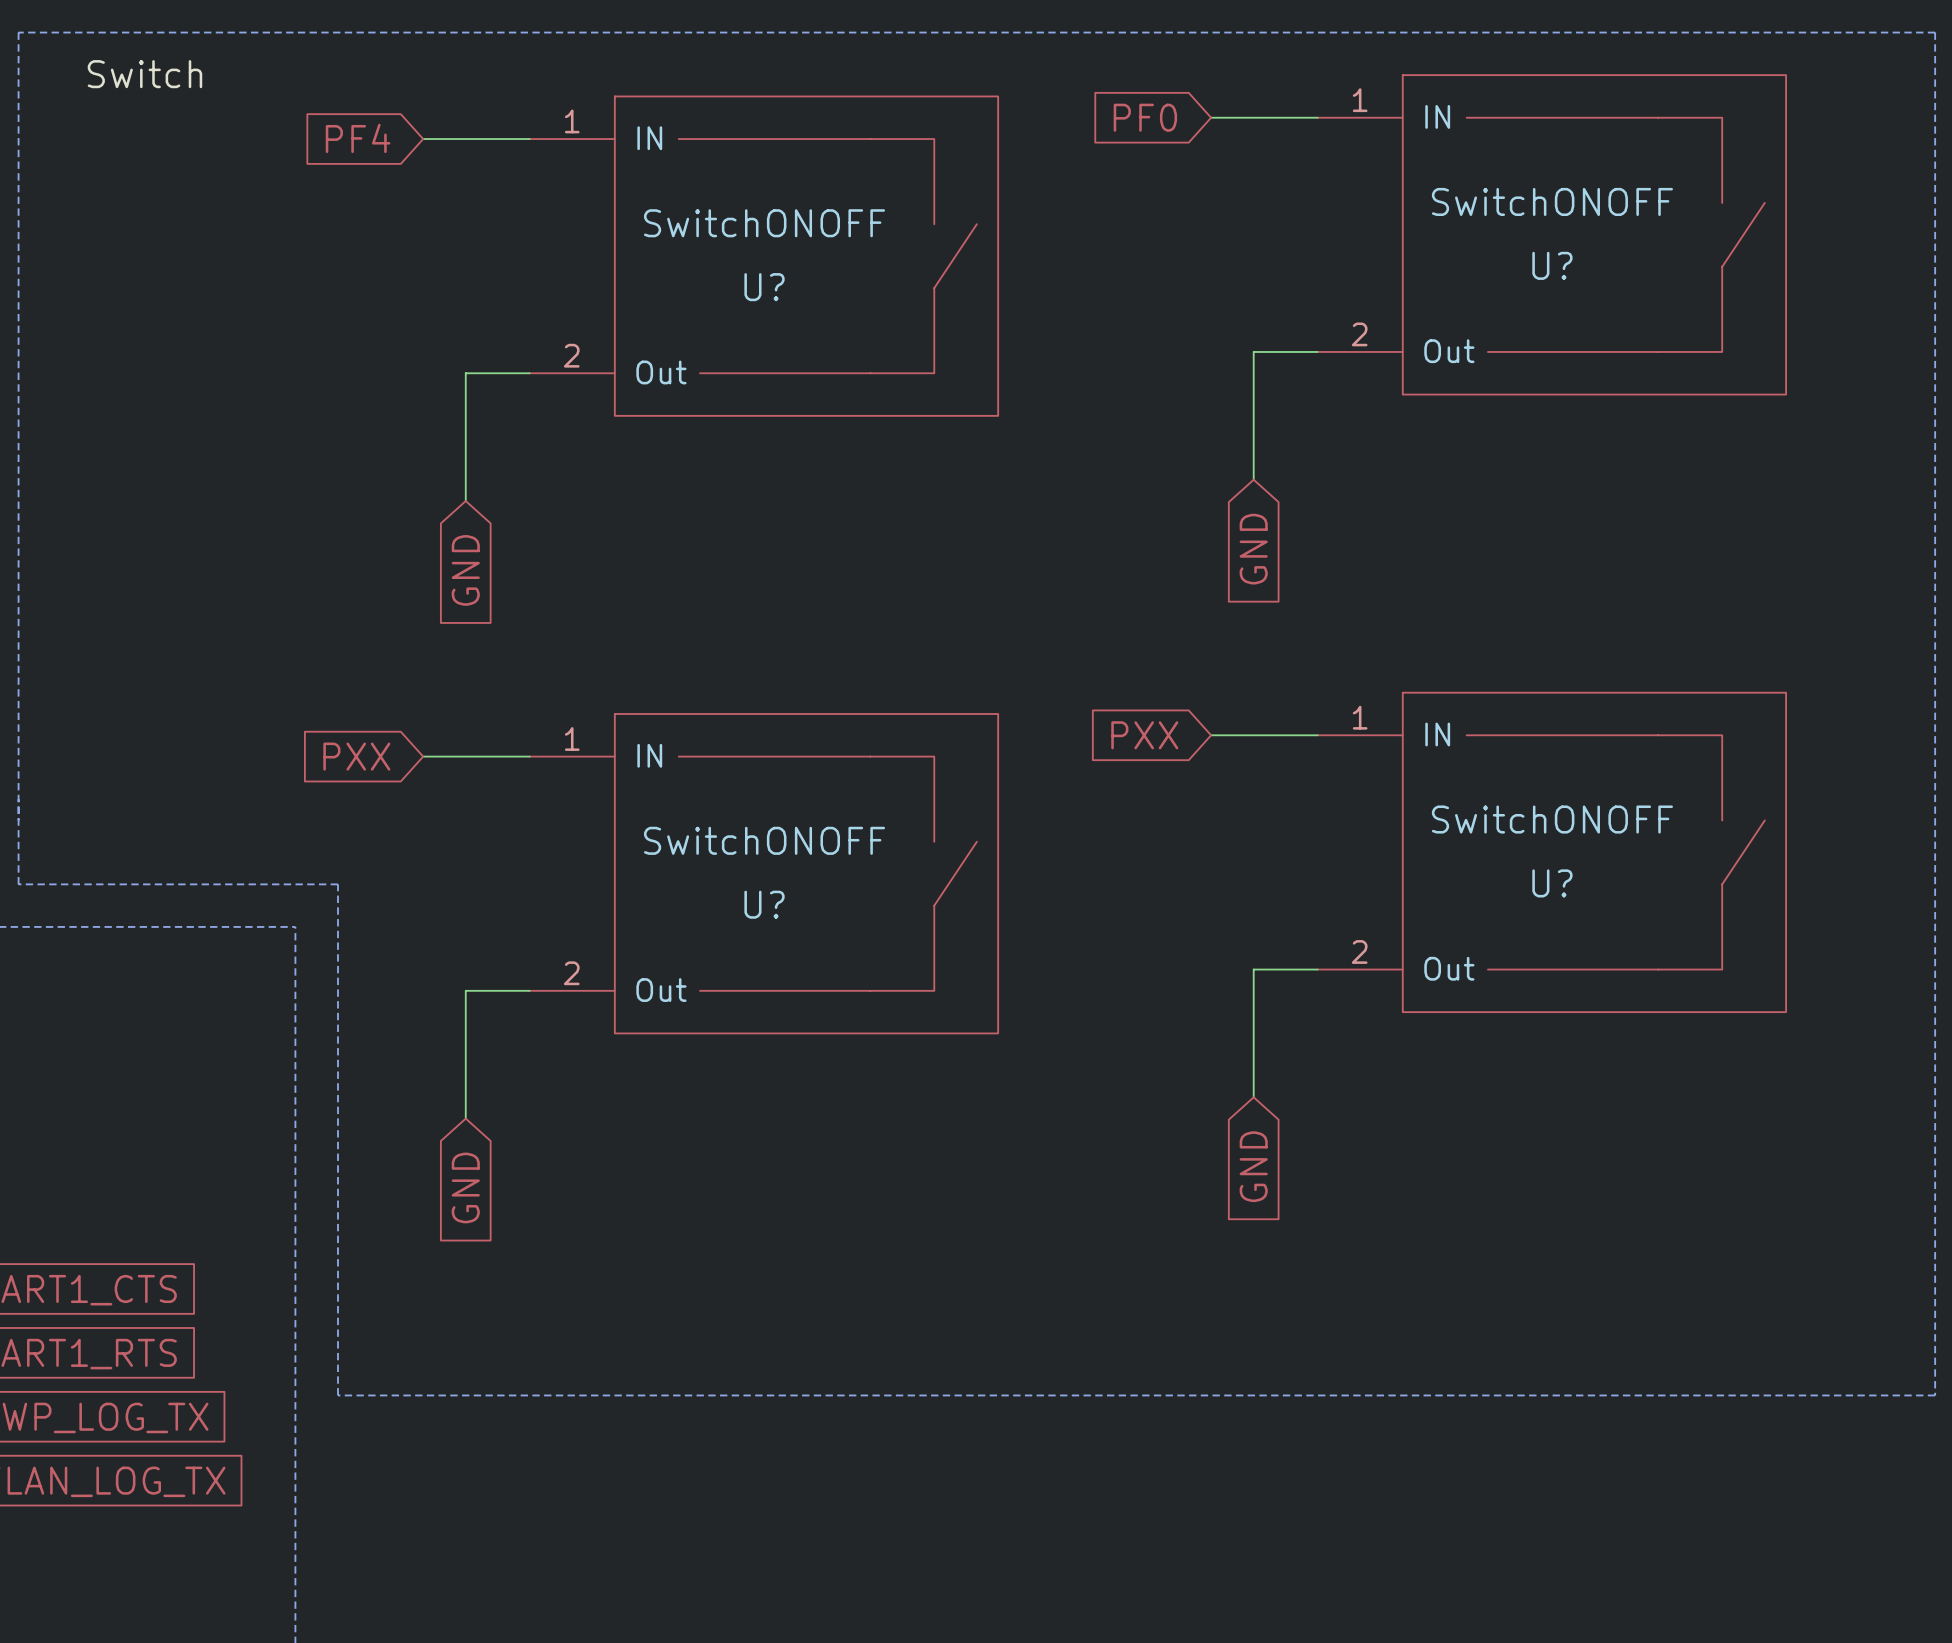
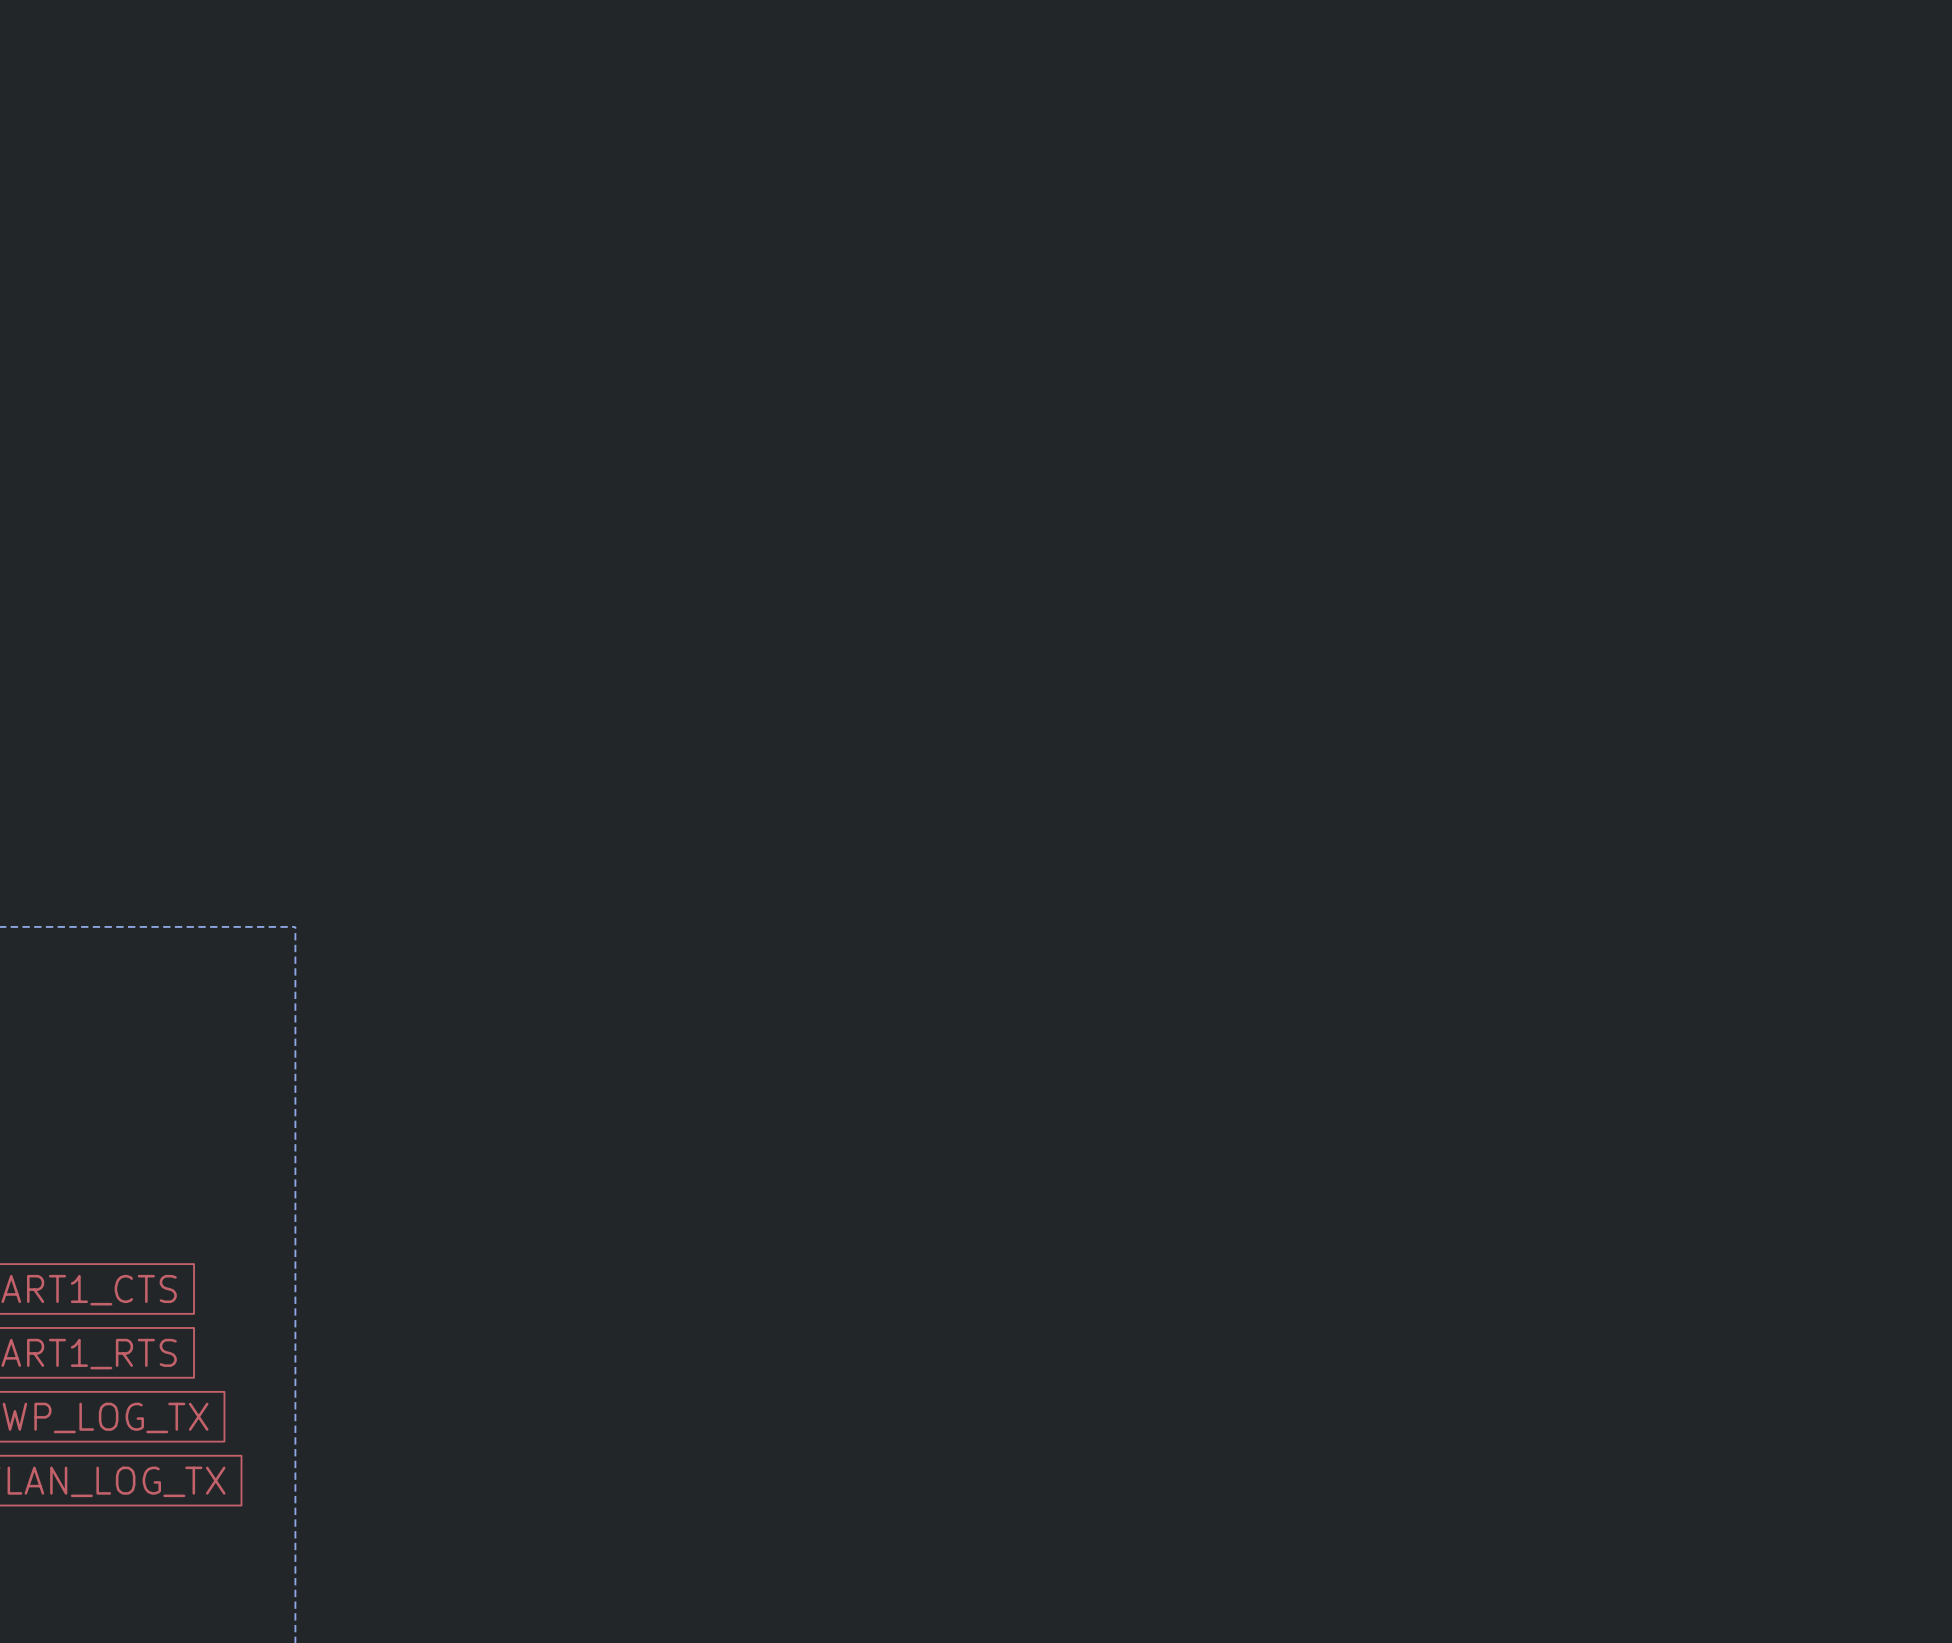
line: (18, 32) (18, 884) (337, 884) (337, 1395) (1935, 1395) (1935, 32) (18, 32) -> none
label: Switch (144, 74) -> none
global label: PF0 (1145, 117) -> none
wire: (1211, 117) (1317, 117) -> none
global label: PF4 (358, 138) -> none
wire: (423, 139) (529, 139) -> none
U?: SwitchONOFF (1551, 234) -> none
U?: SwitchONOFF (763, 256) -> none
wire: (1317, 351) (1253, 351) (1253, 479) -> none
wire: (529, 373) (465, 373) (465, 501) -> none
global label: GND (1253, 549) -> none
global label: GND (465, 570) -> none
global label: PXX (1144, 735) -> none
wire: (1211, 735) (1317, 735) -> none
global label: PXX (356, 756) -> none
wire: (423, 756) (529, 756) -> none
U?: SwitchONOFF (1551, 852) -> none
U?: SwitchONOFF (763, 873) -> none
wire: (1317, 969) (1253, 969) (1253, 1097) -> none
wire: (529, 990) (465, 990) (465, 1118) -> none
global label: GND (1253, 1166) -> none
global label: GND (465, 1187) -> none

